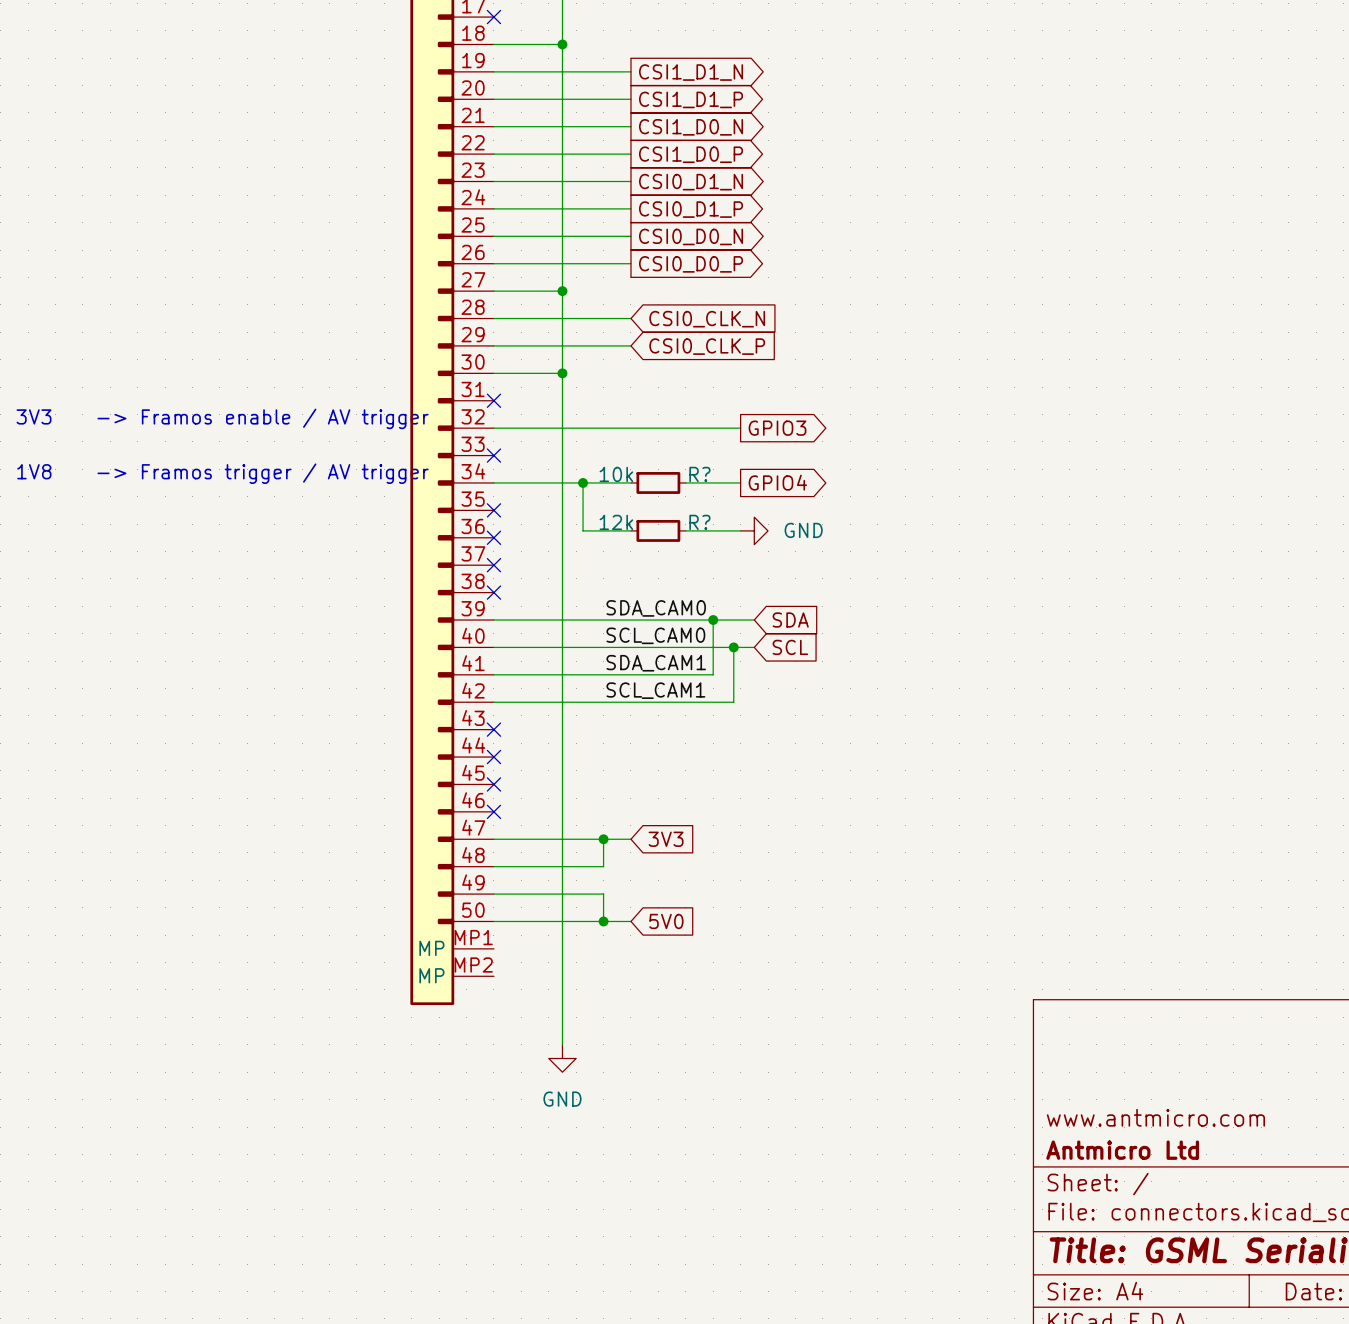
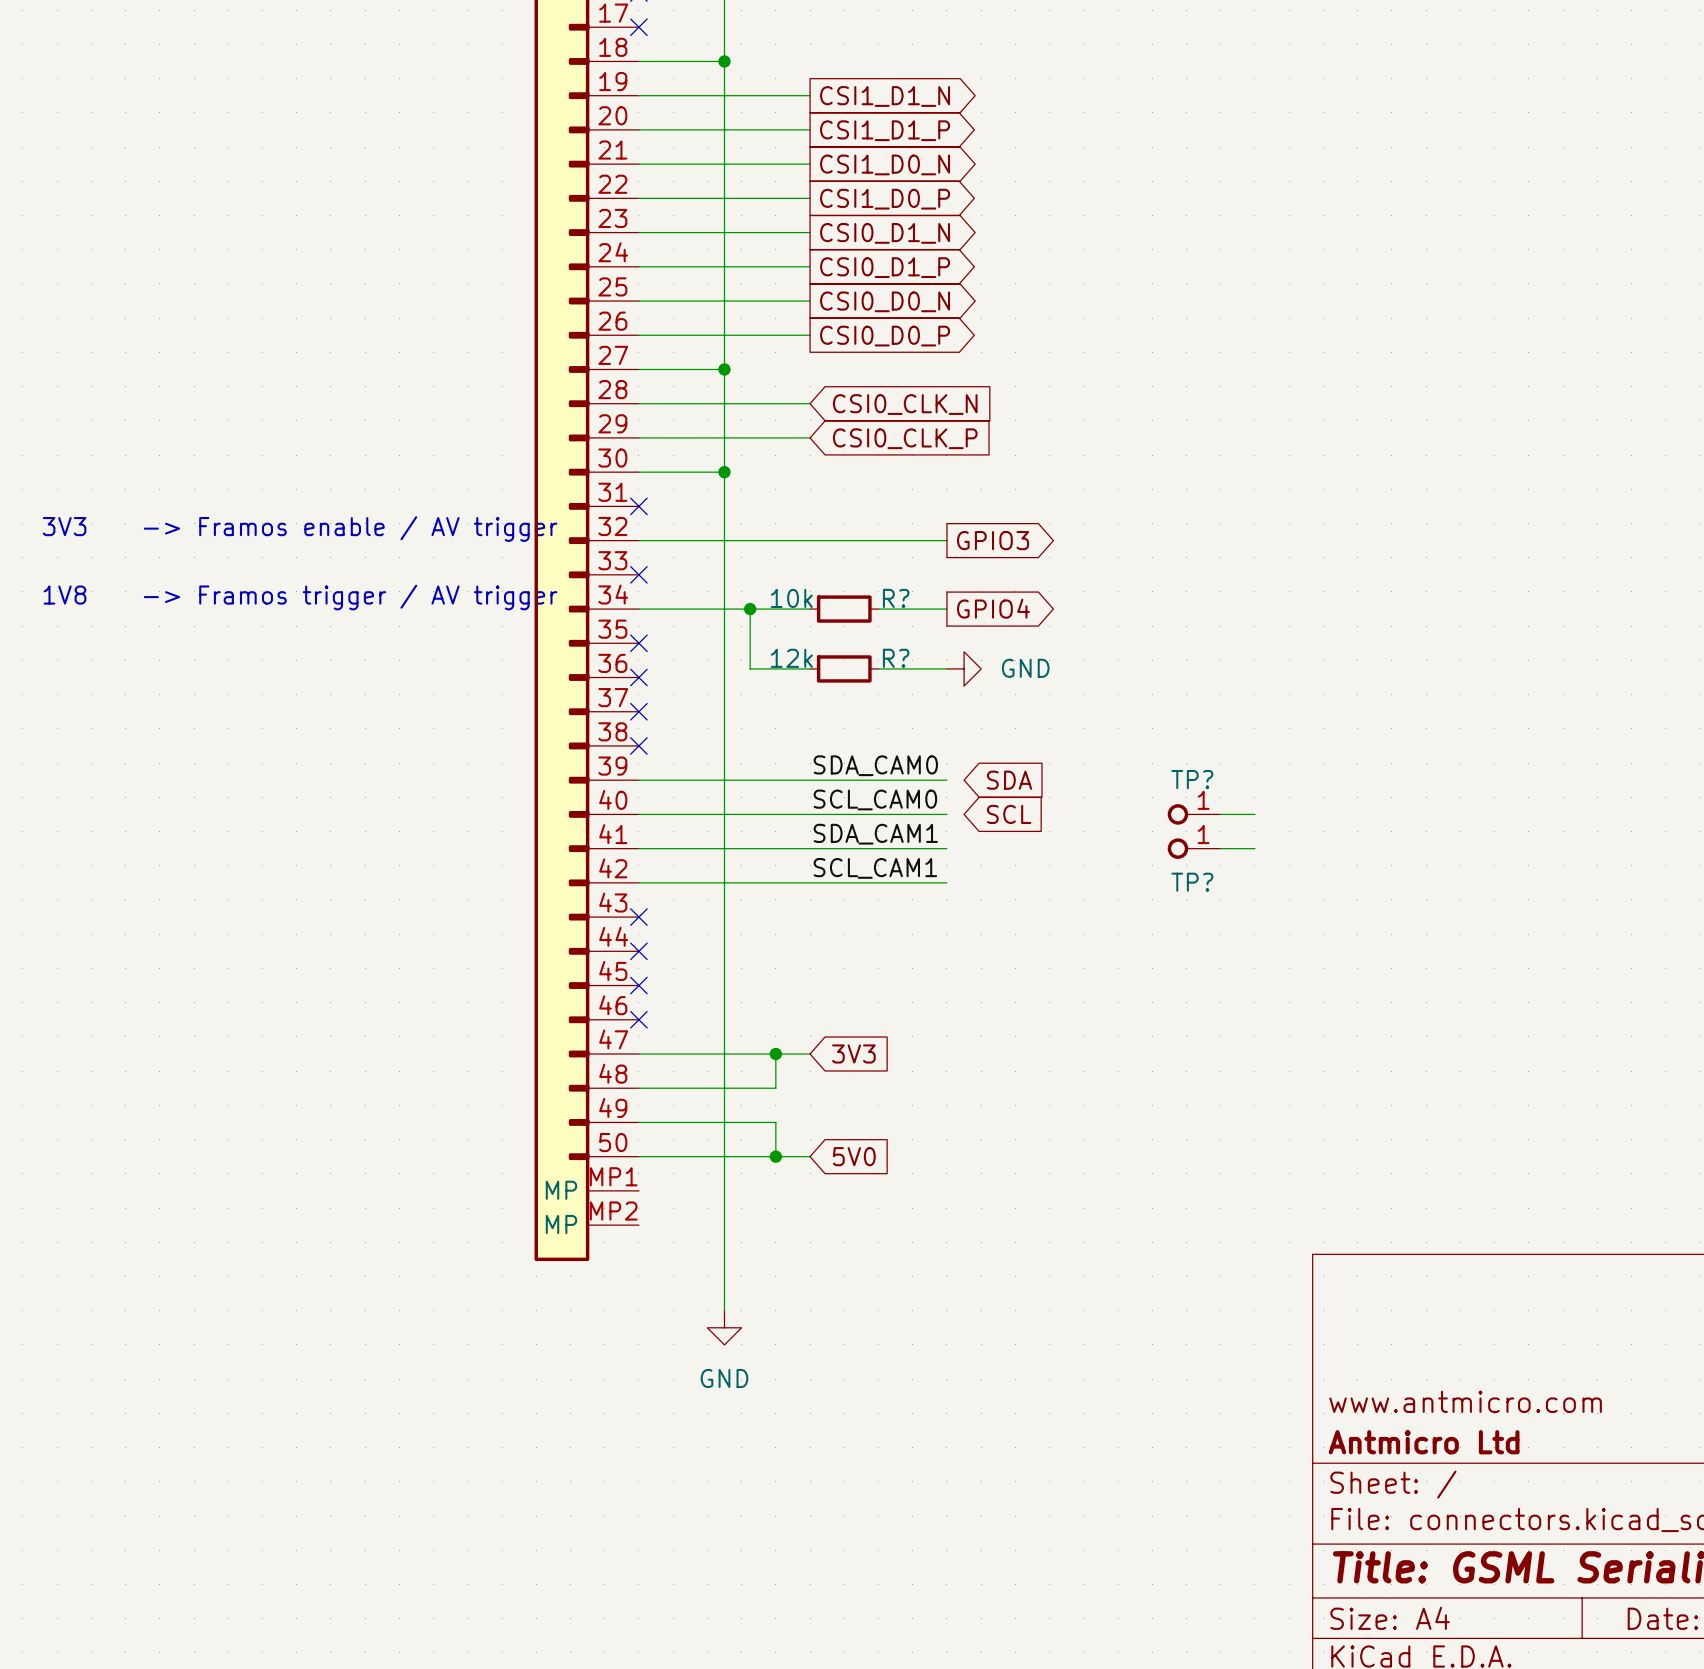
label position: SDA_CAM0 (656, 608) -> SDA_CAM0 (875, 765)
wire: (713, 620) (713, 674) -> (946, 848) (912, 848)
junction: (713, 620) -> none
wire: (740, 620) (754, 620) -> none
label position: SCL_CAM0 (655, 635) -> SCL_CAM0 (875, 799)
wire: (733, 647) (733, 702) -> (946, 882) (938, 882)
junction: (733, 647) -> none
wire: (740, 647) (754, 647) -> none
TP?: none -> (1194, 814)
wire: none -> (1220, 814) (1254, 814)
label position: SDA_CAM1 (656, 663) -> SDA_CAM1 (875, 834)
TP?: none -> (1194, 848)
wire: none -> (1220, 848) (1254, 848)
label position: SCL_CAM1 (655, 690) -> SCL_CAM1 (875, 868)

